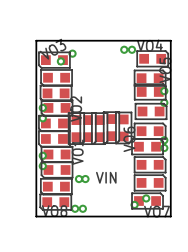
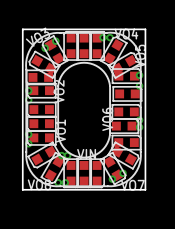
line: none -> (60, 32) (117, 33) (128, 38) (137, 49) (140, 60) (140, 159) (134, 173) (122, 183) (111, 186) (52, 186) (38, 179) (28, 167) (26, 155) (26, 58) (30, 48) (37, 40) (46, 35) (60, 32)
part: none -> (71, 45)
part: none -> (84, 45)
part: none -> (97, 45)
part: (152, 58) -> none
part: (54, 60) -> none
part: none -> (55, 51)
part: none -> (113, 52)
part rotation: 0° (56, 77) -> 30° clockwise (44, 64)
part rotation: 0° (150, 78) -> 30° counterclockwise (124, 65)
line: none -> (58, 85) (58, 134) (60, 143) (66, 150) (74, 155) (84, 157) (96, 154) (105, 146) (110, 134) (110, 85) (107, 76) (96, 65) (80, 62) (66, 69) (60, 76) (58, 85)
part: (54, 123) -> none
part: (111, 127) -> none
part: (123, 127) -> none
part: none -> (41, 109)
part: (76, 128) -> none
part: (88, 128) -> none
part: (99, 128) -> none
part: (54, 138) -> none
part: none -> (41, 123)
part: (57, 154) -> none
part: none -> (41, 137)
part: (57, 169) -> none
part: none -> (44, 154)
part rotation: 0° (150, 182) -> 30° clockwise (123, 155)
part: (56, 186) -> none
part: none -> (54, 167)
part: none -> (113, 168)
part: none -> (71, 173)
part: none -> (84, 173)
part: none -> (97, 173)
part: (147, 201) -> none
part: (55, 202) -> none

